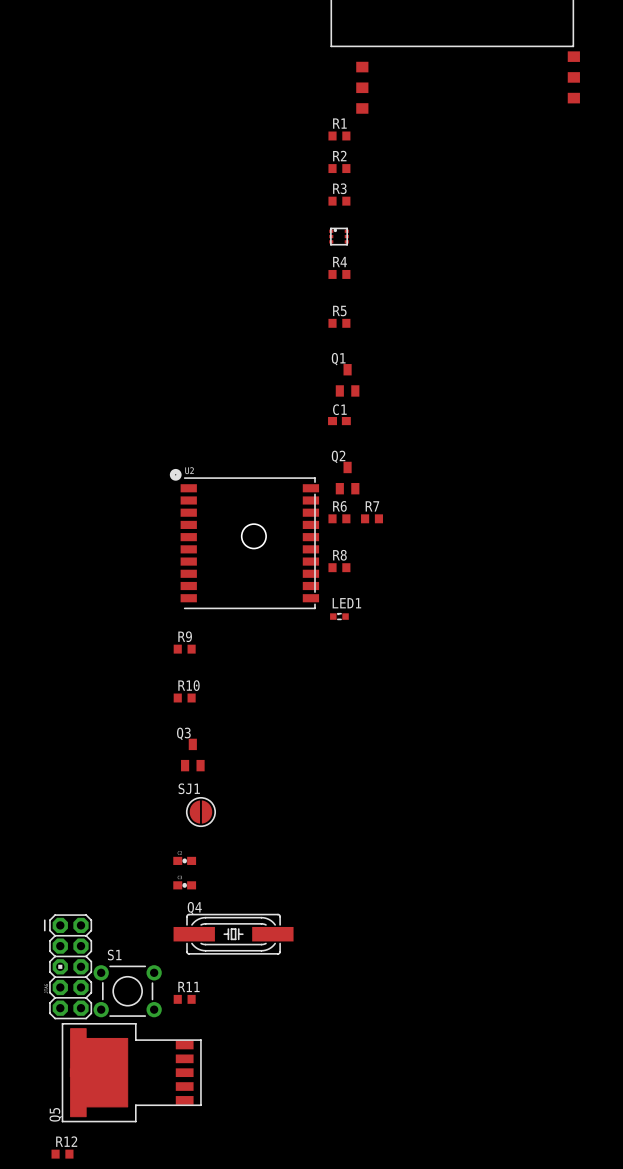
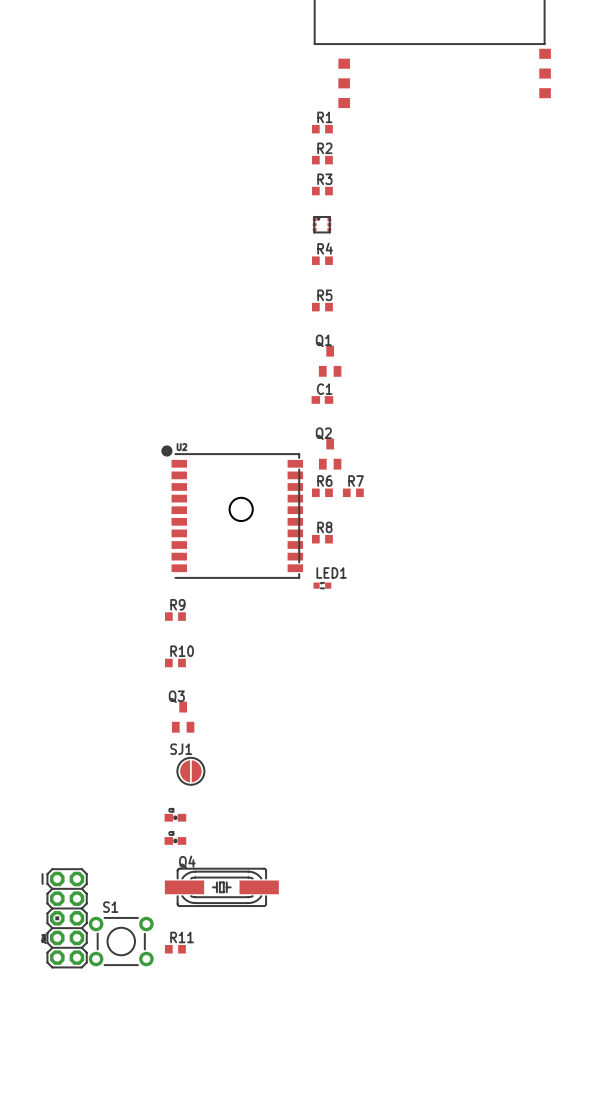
Q5: (131, 1072) -> none
R12: (62, 1154) -> none

